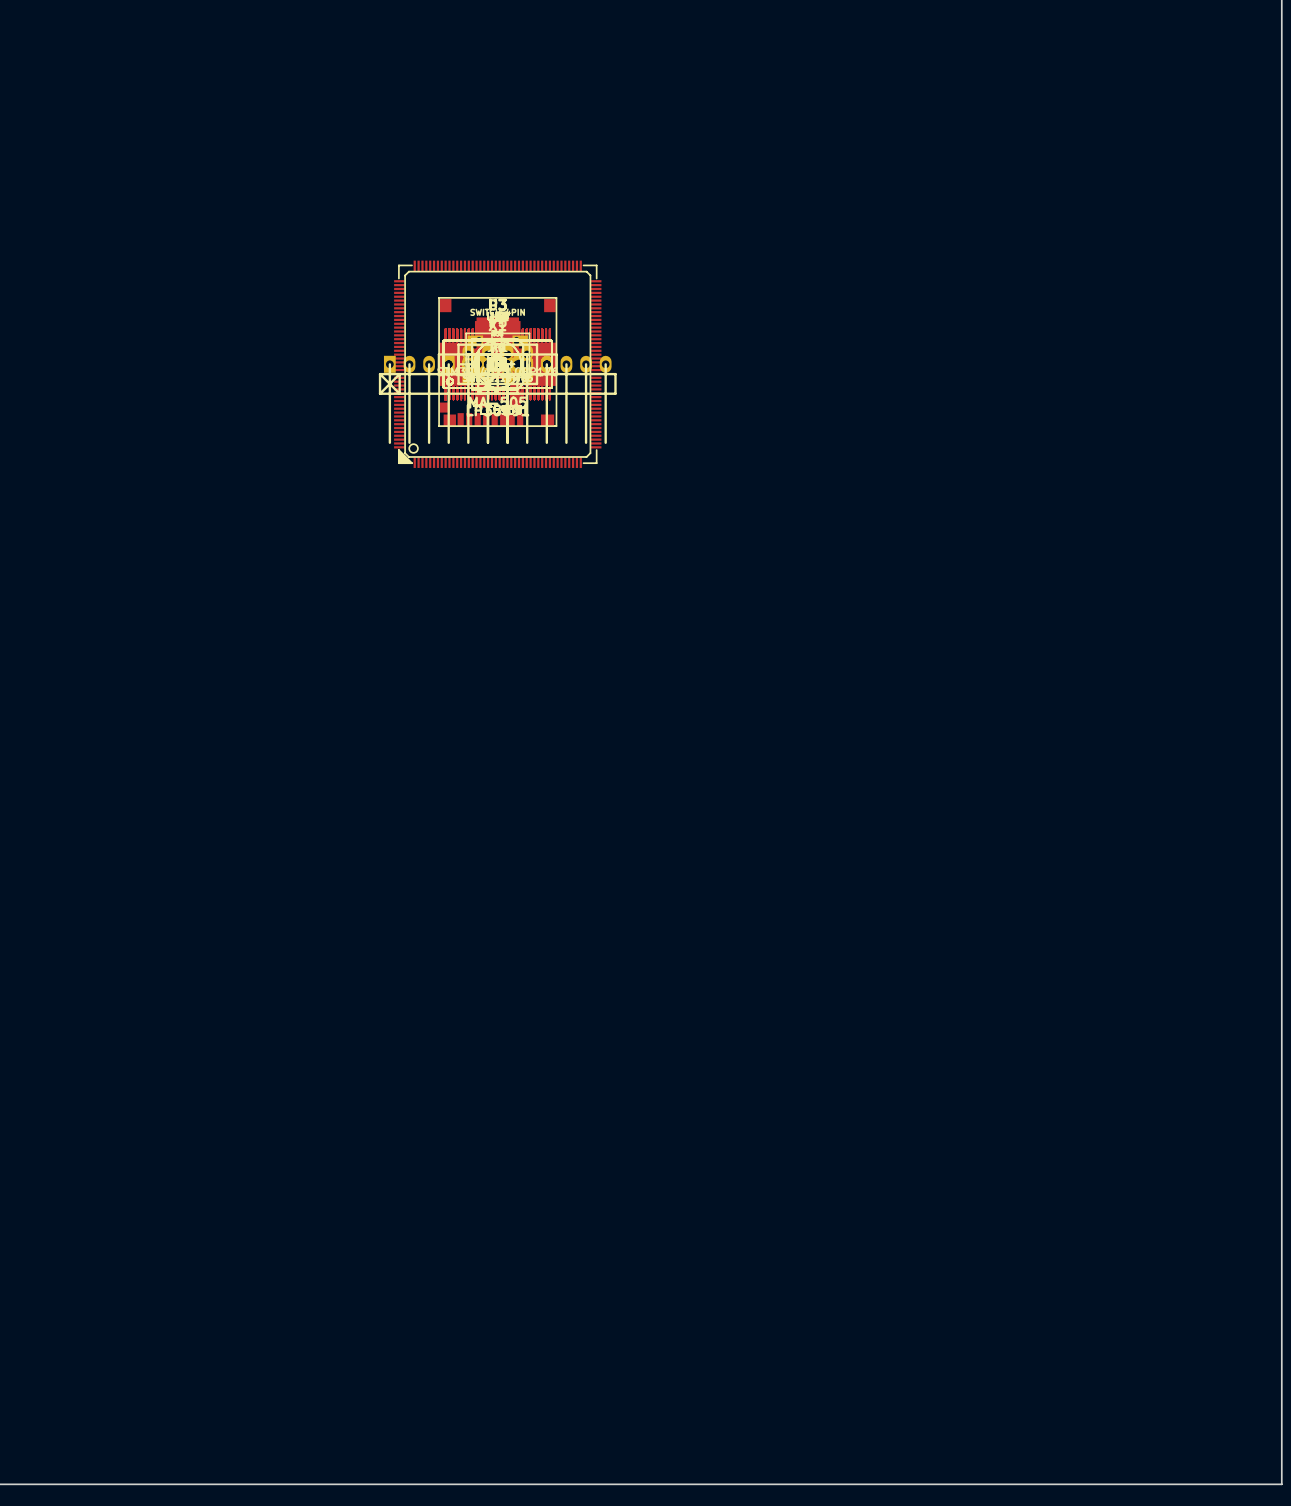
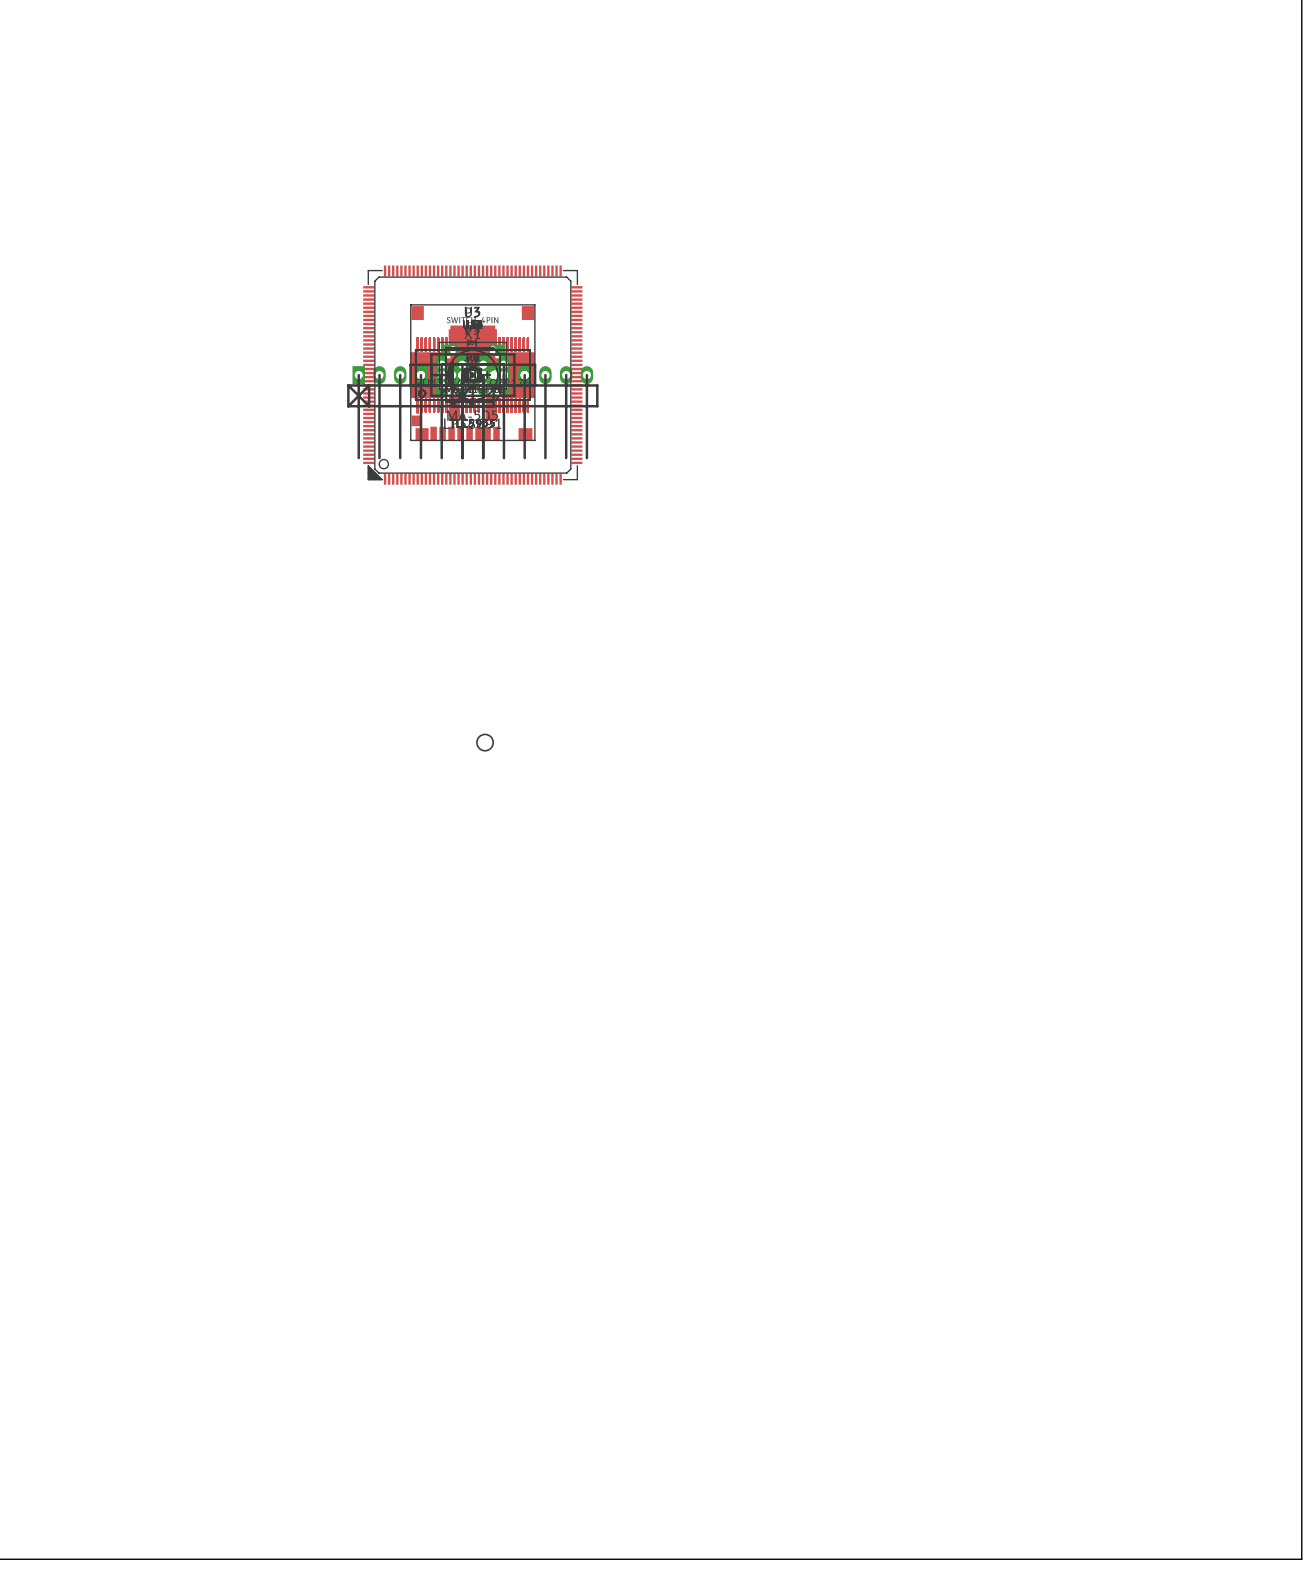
drawing: none -> [476, 733, 495, 752]

